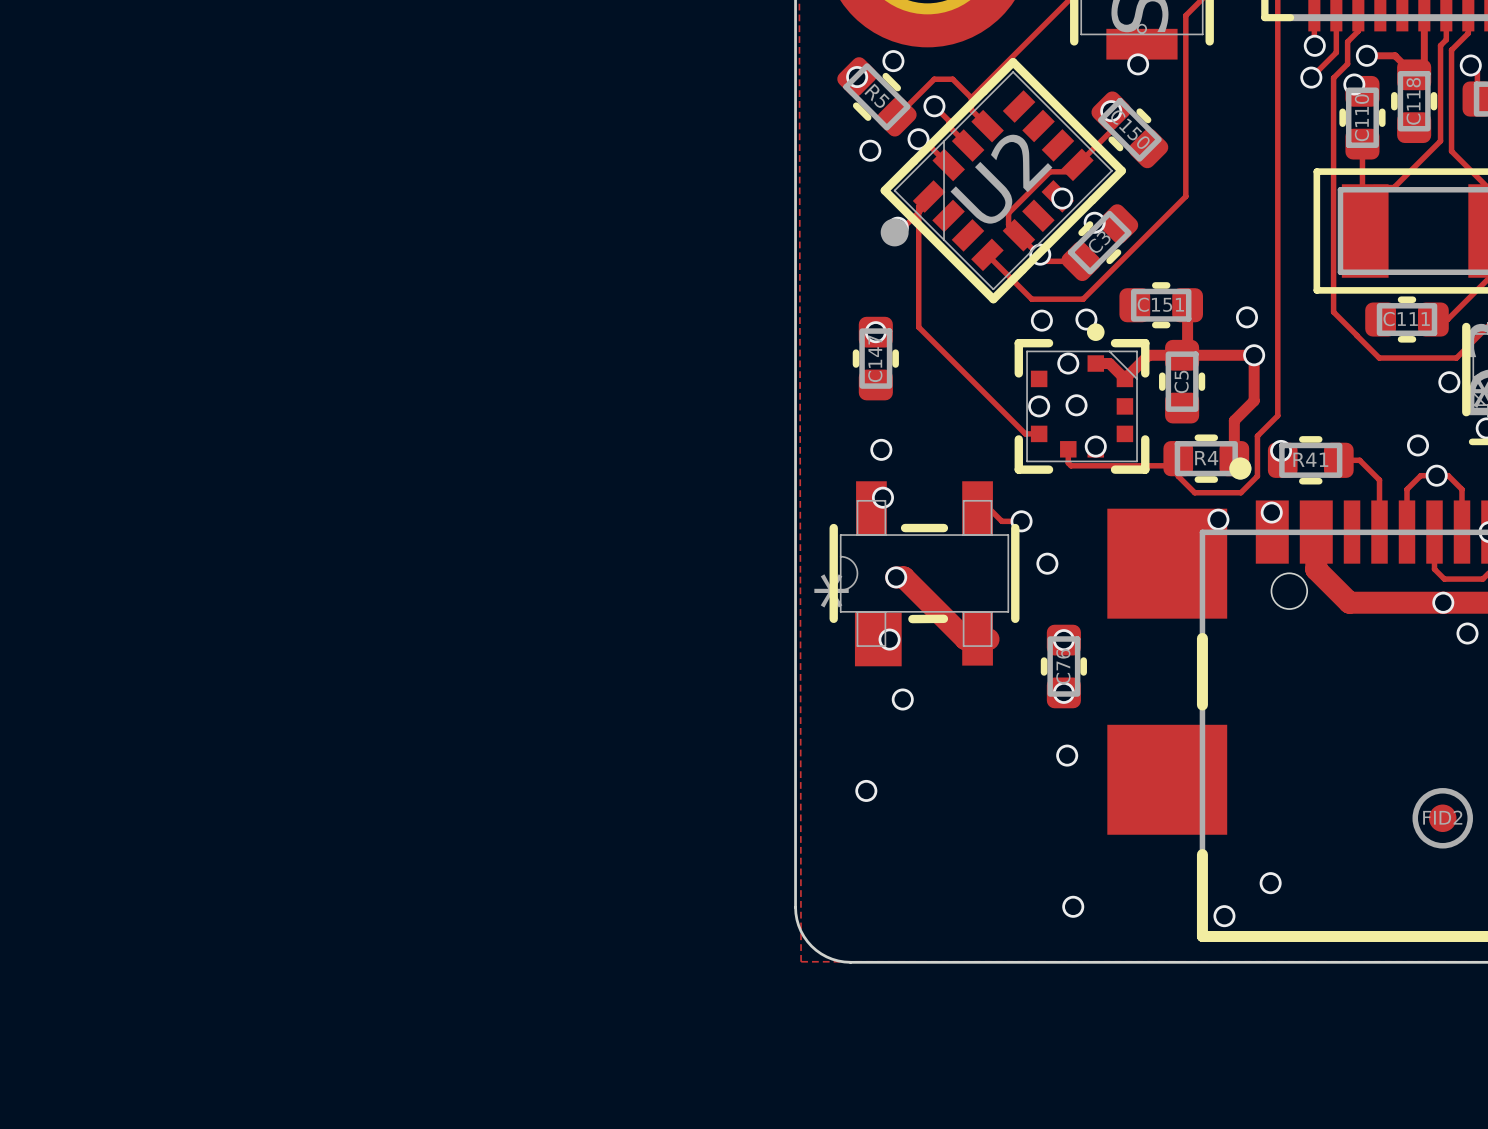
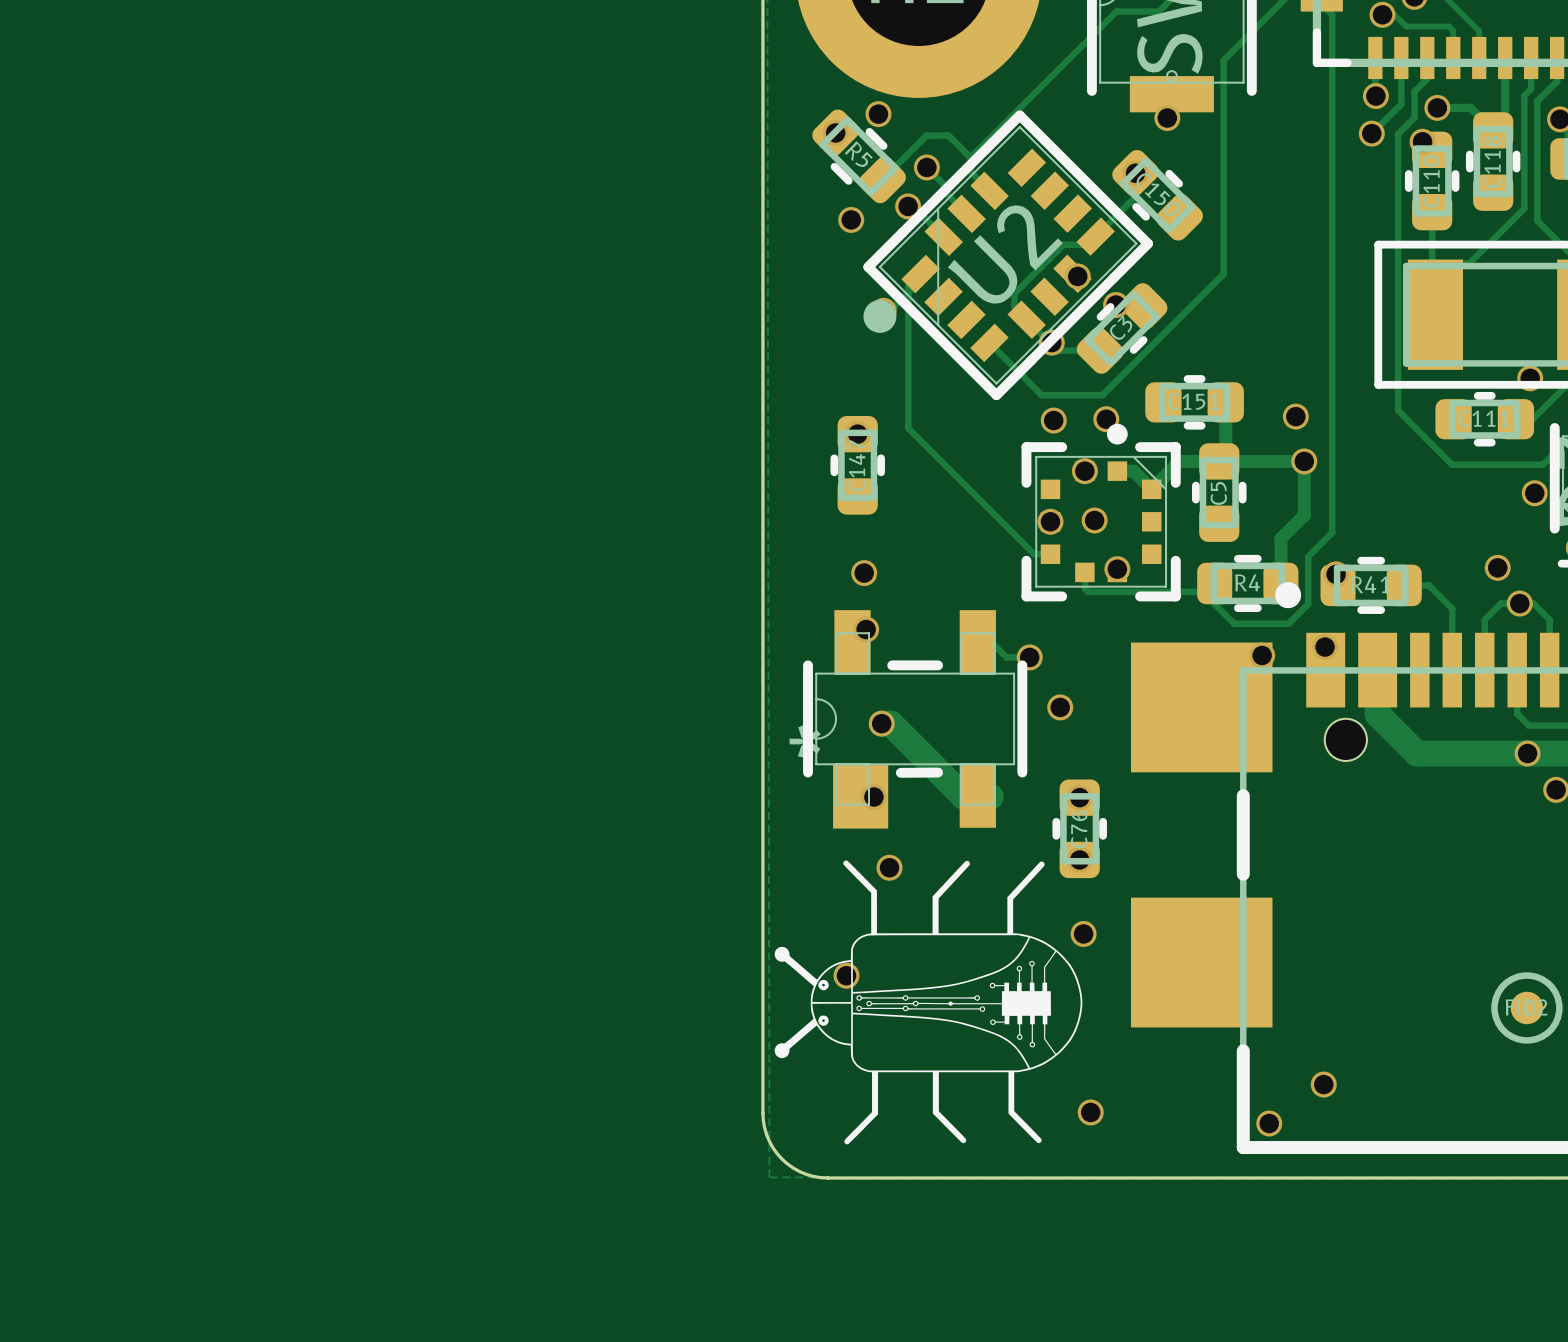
via: none -> (1530, 378)
drawing: none -> [774, 860, 1083, 1145]

